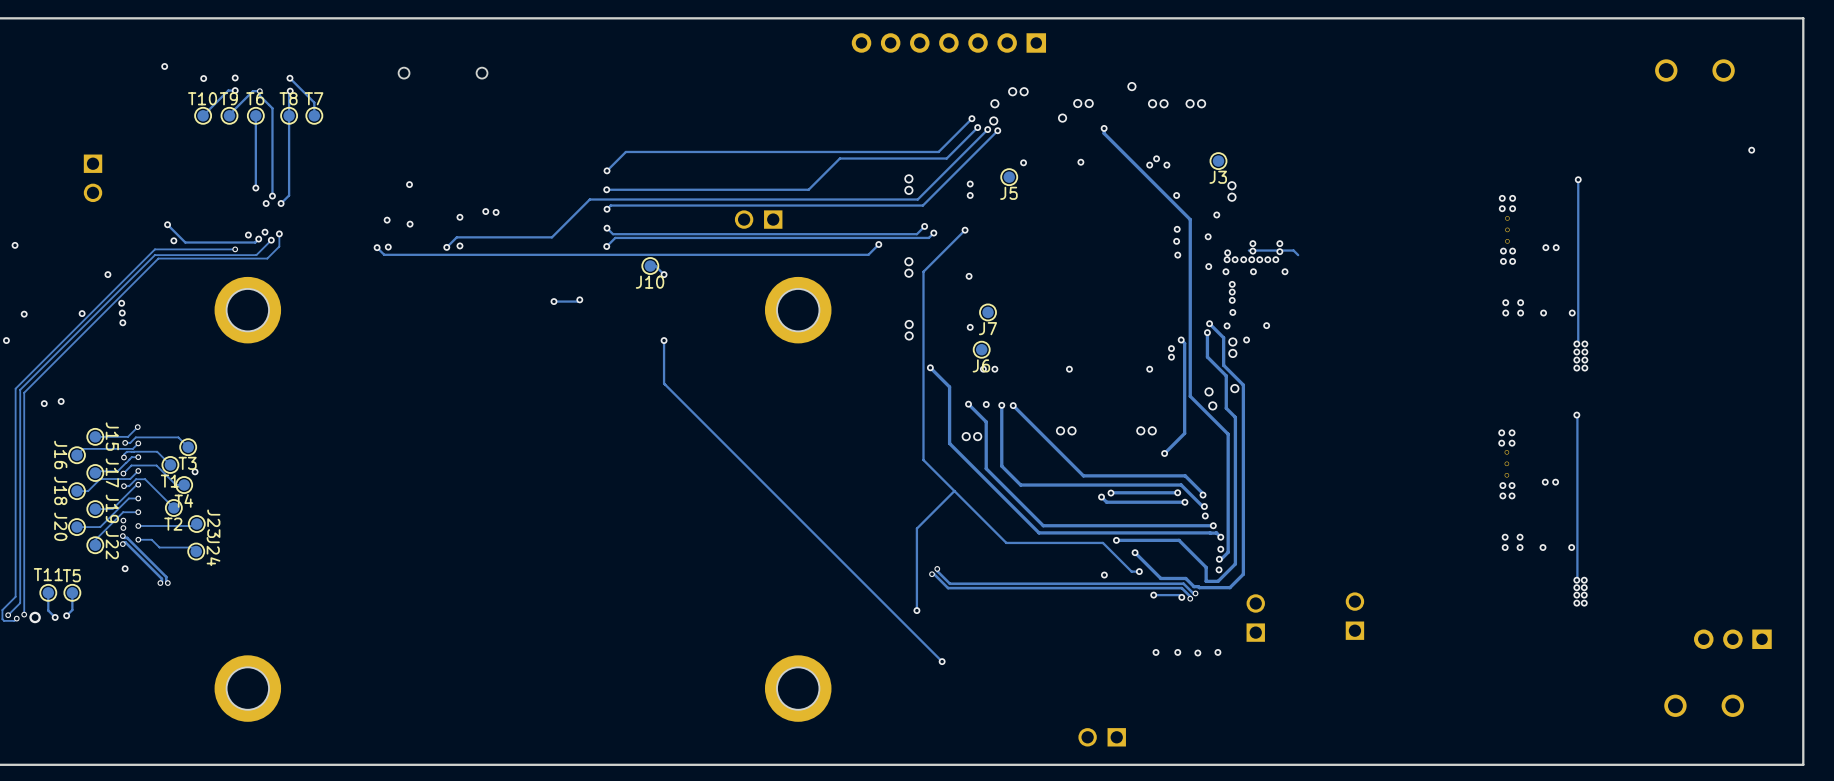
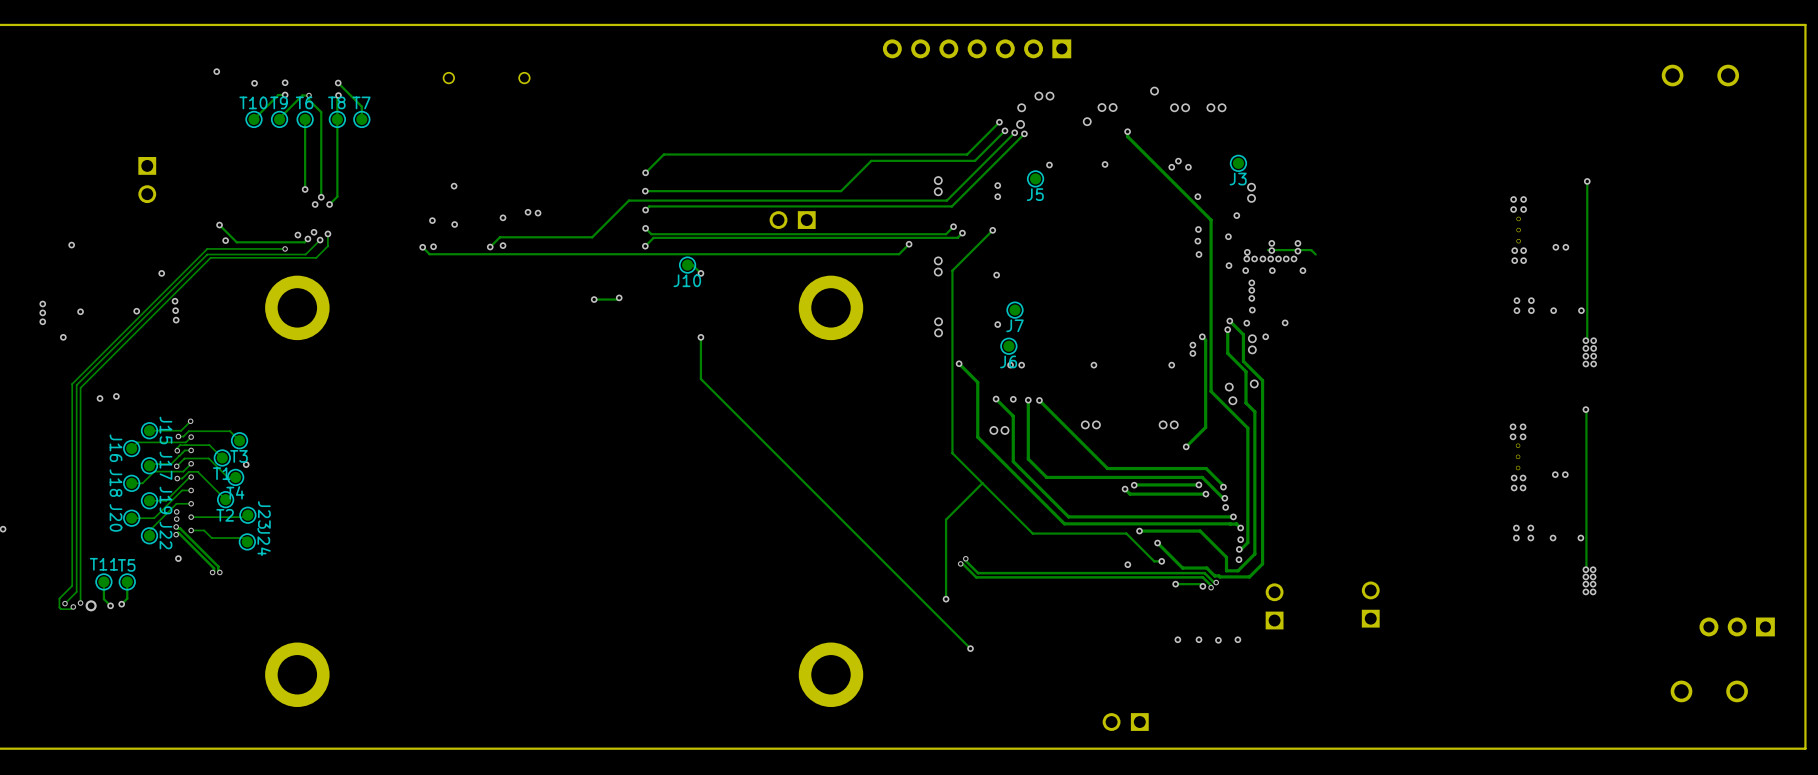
via: (1751, 150) -> none

